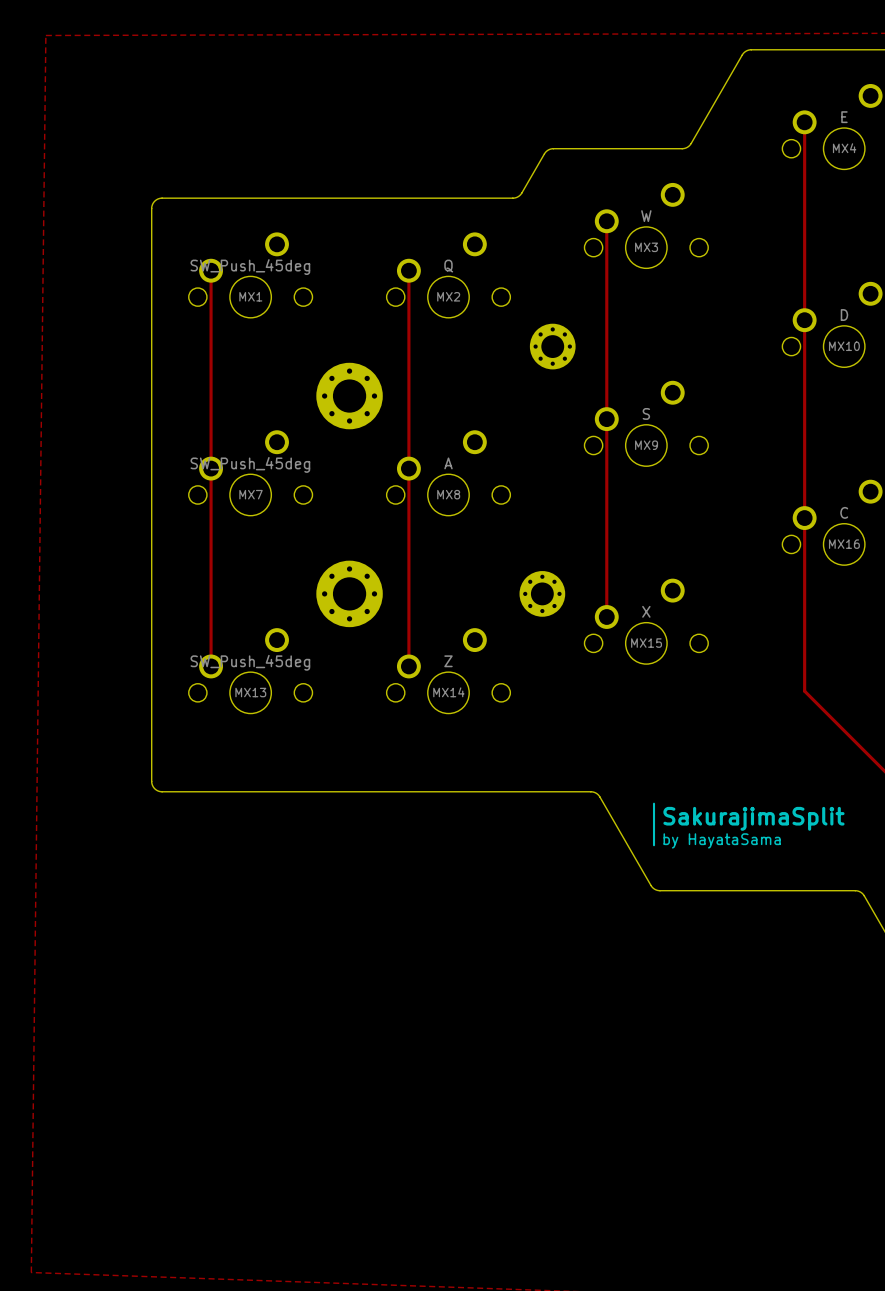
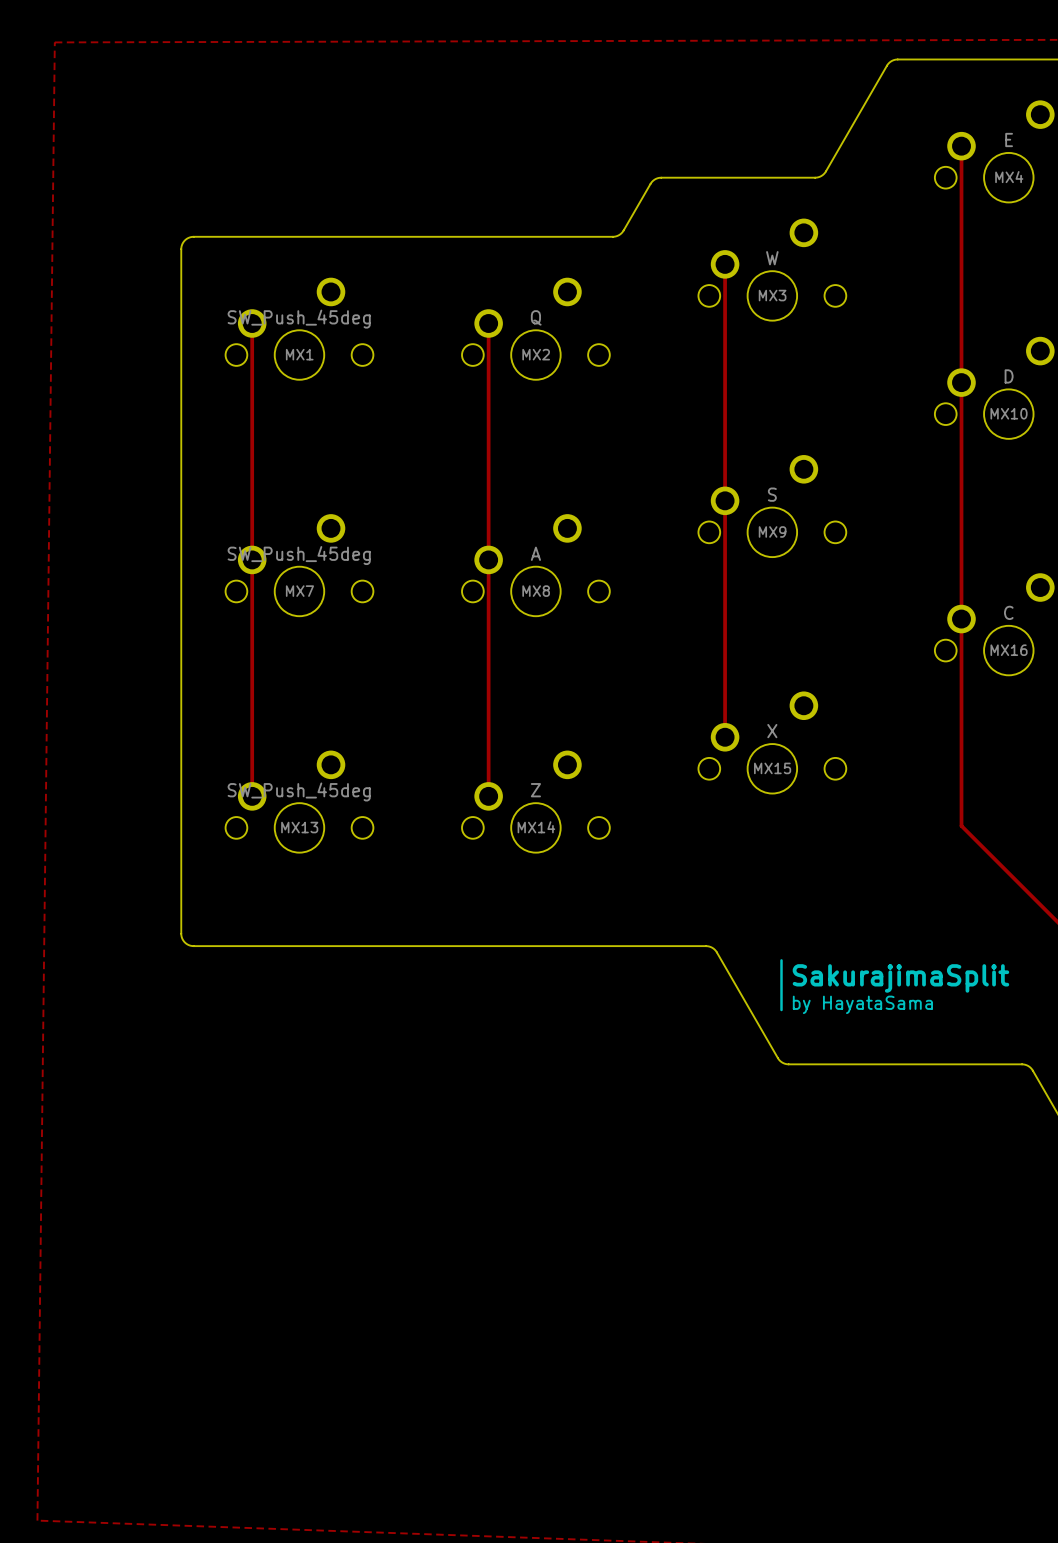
part: (552, 346) -> none
part: (349, 396) -> none
part: (349, 593) -> none
part: (542, 593) -> none

